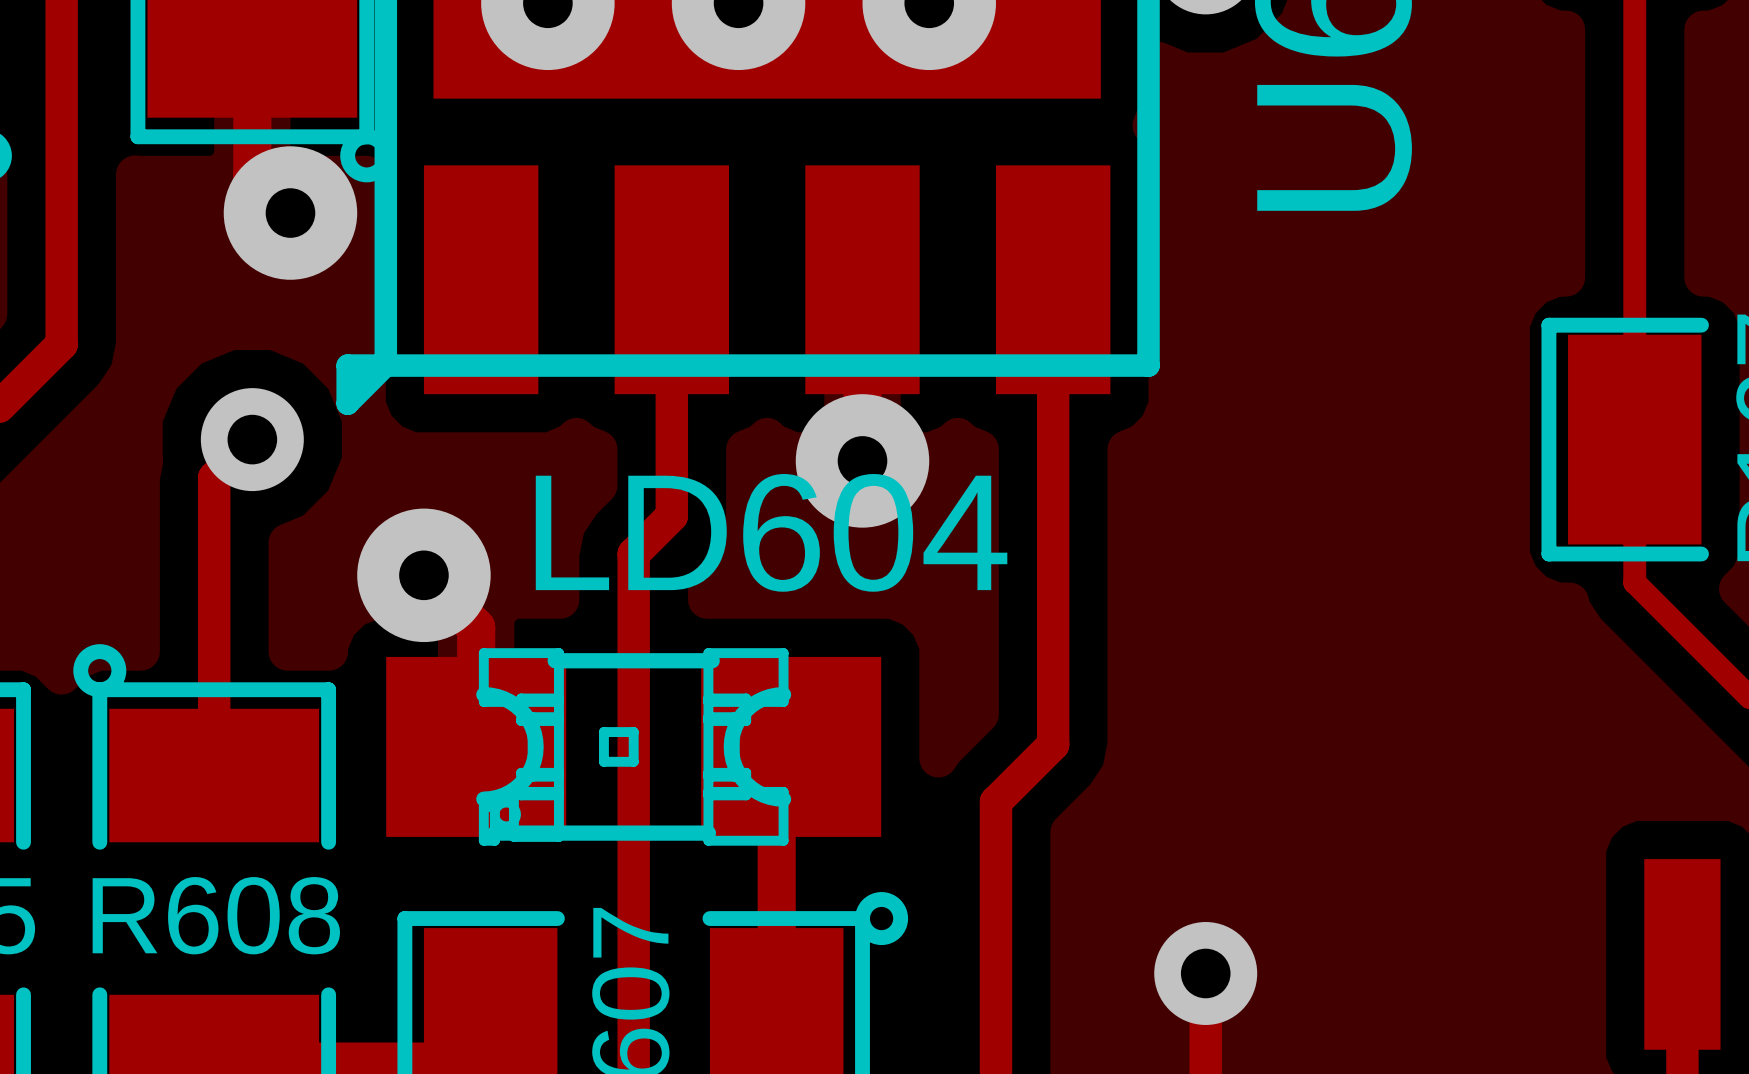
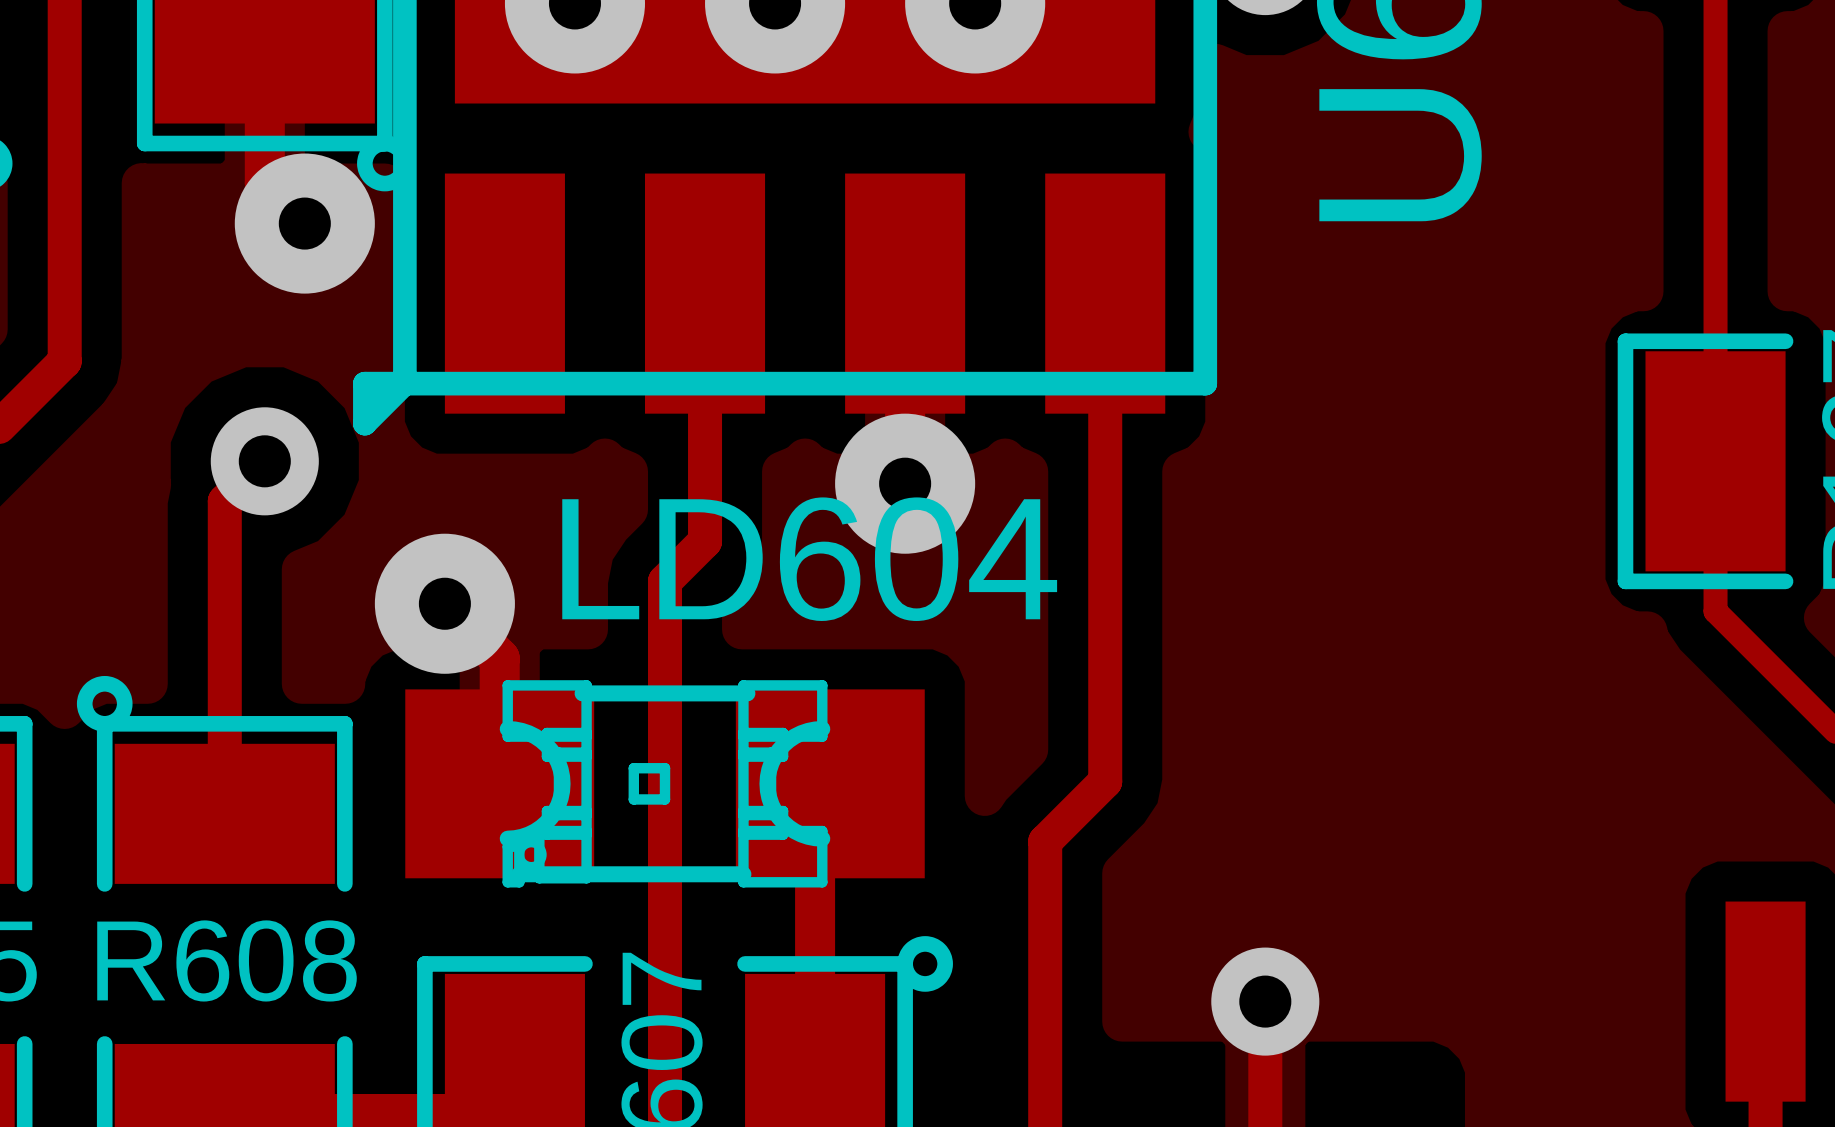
via position: (1205, 973) -> (1265, 1001)

